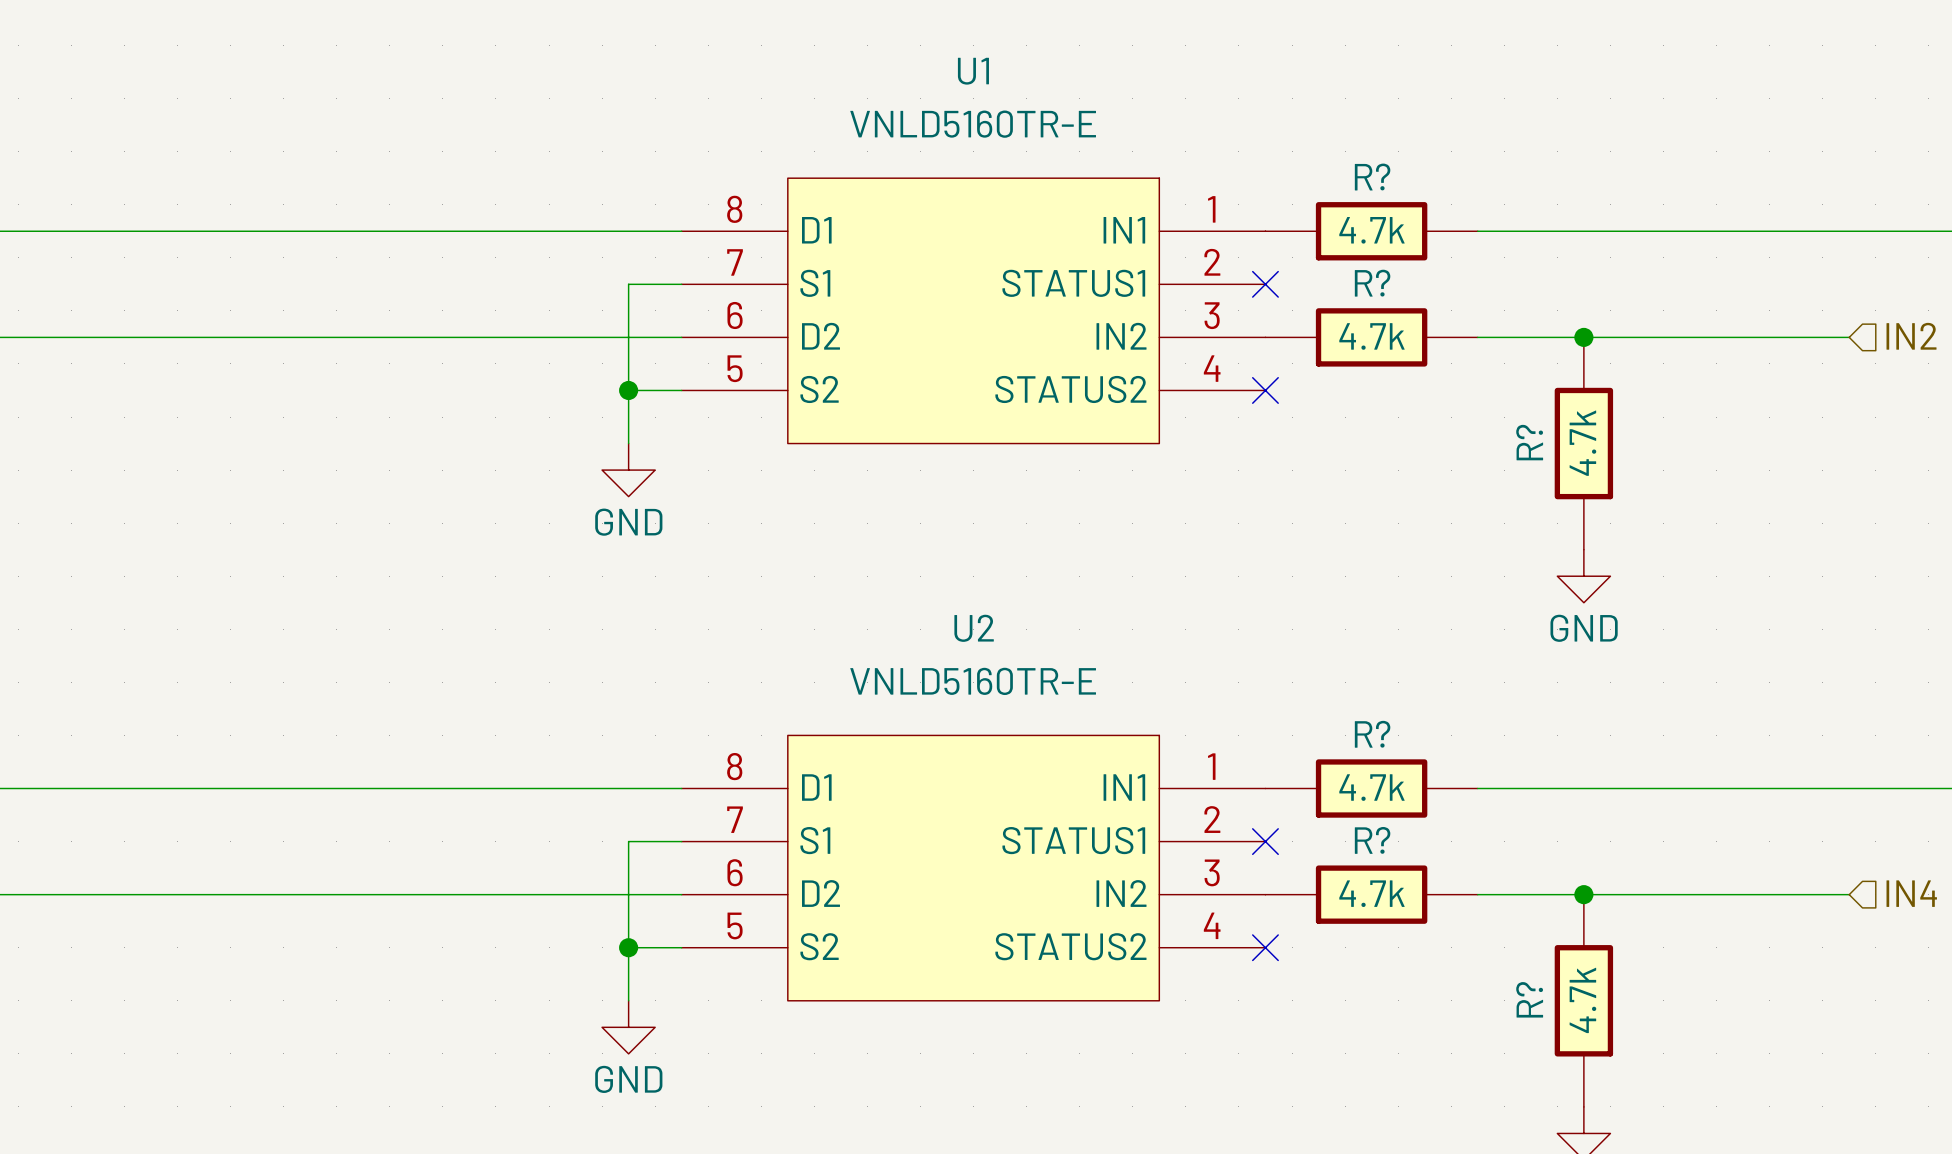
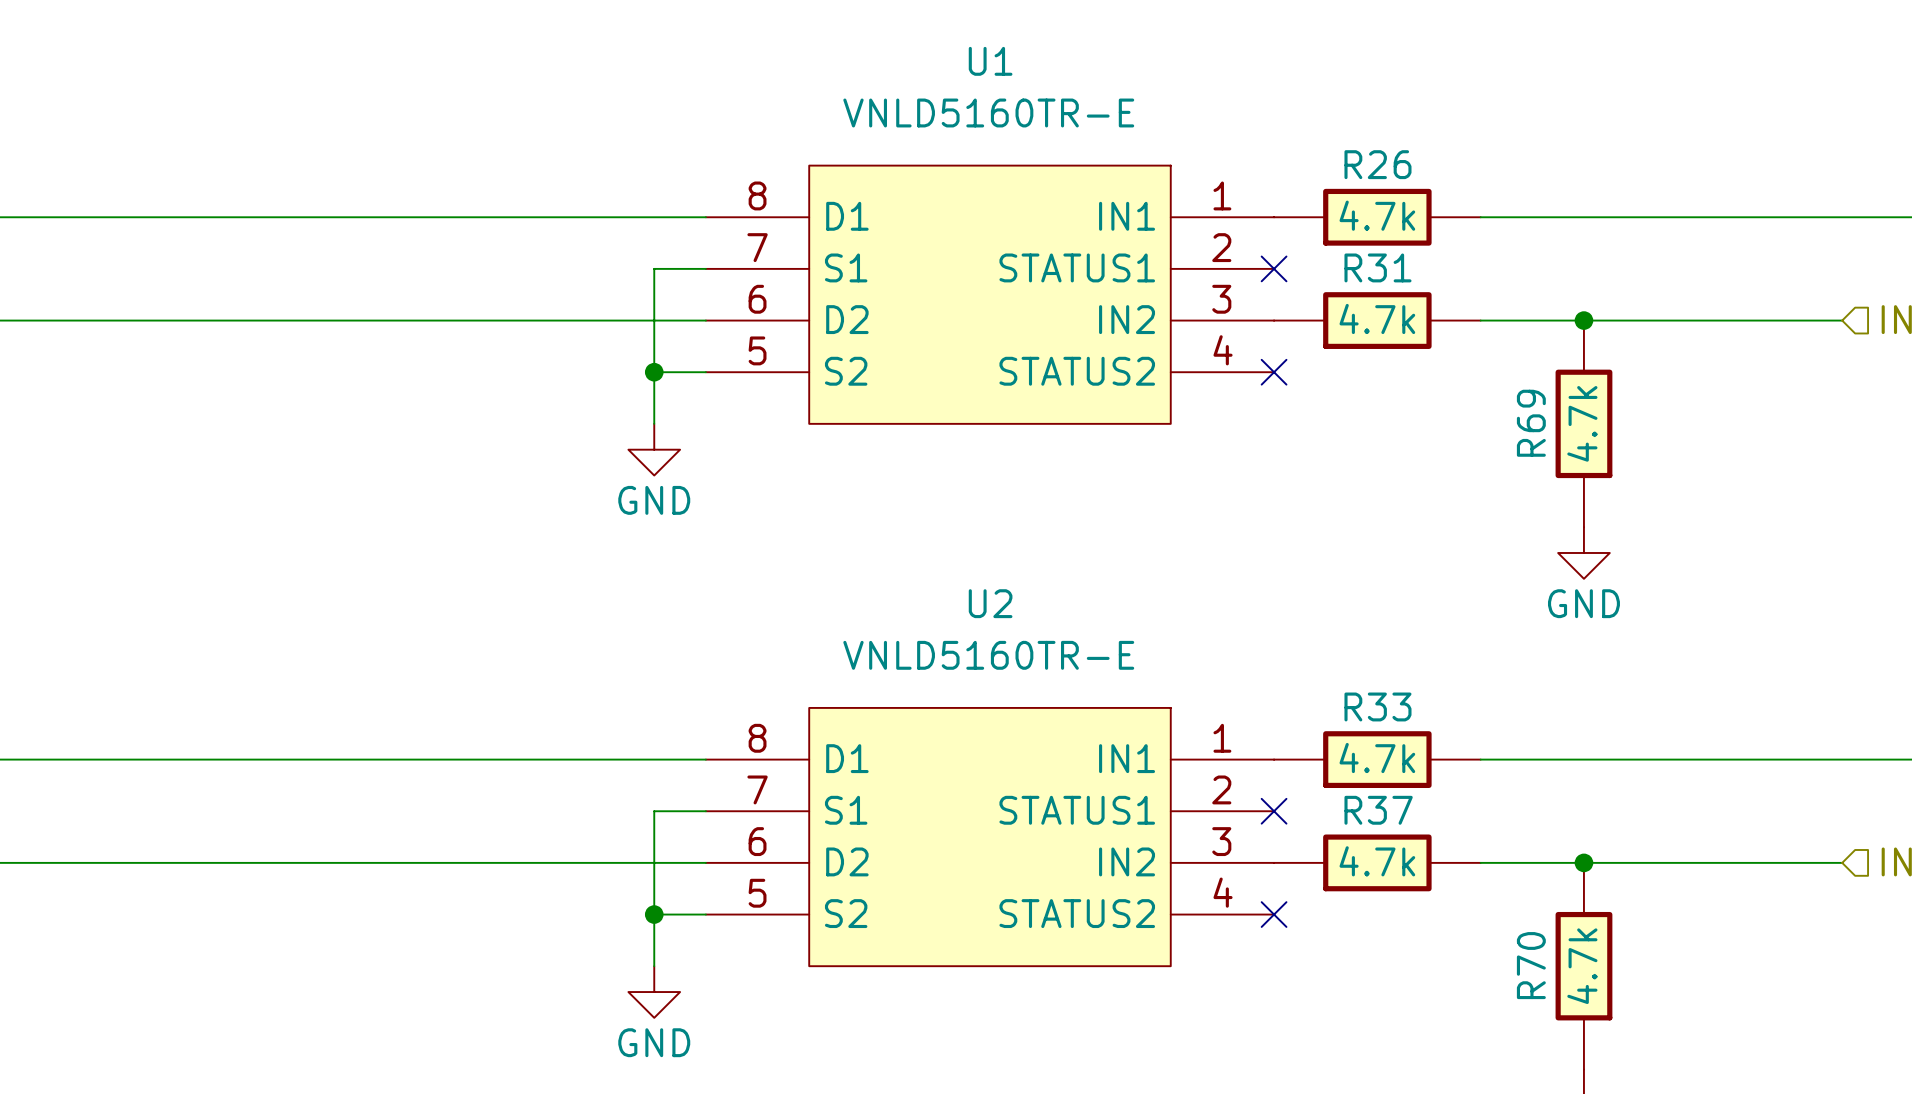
R? name: R? (1372, 177) -> R26 (1377, 164)
R? name: R? (1372, 283) -> R31 (1377, 267)
R? name: R? (1529, 442) -> R69 (1531, 423)
R? name: R? (1372, 734) -> R33 (1377, 706)
R? name: R? (1372, 840) -> R37 (1378, 810)
R? name: R? (1529, 999) -> R70 (1531, 965)

